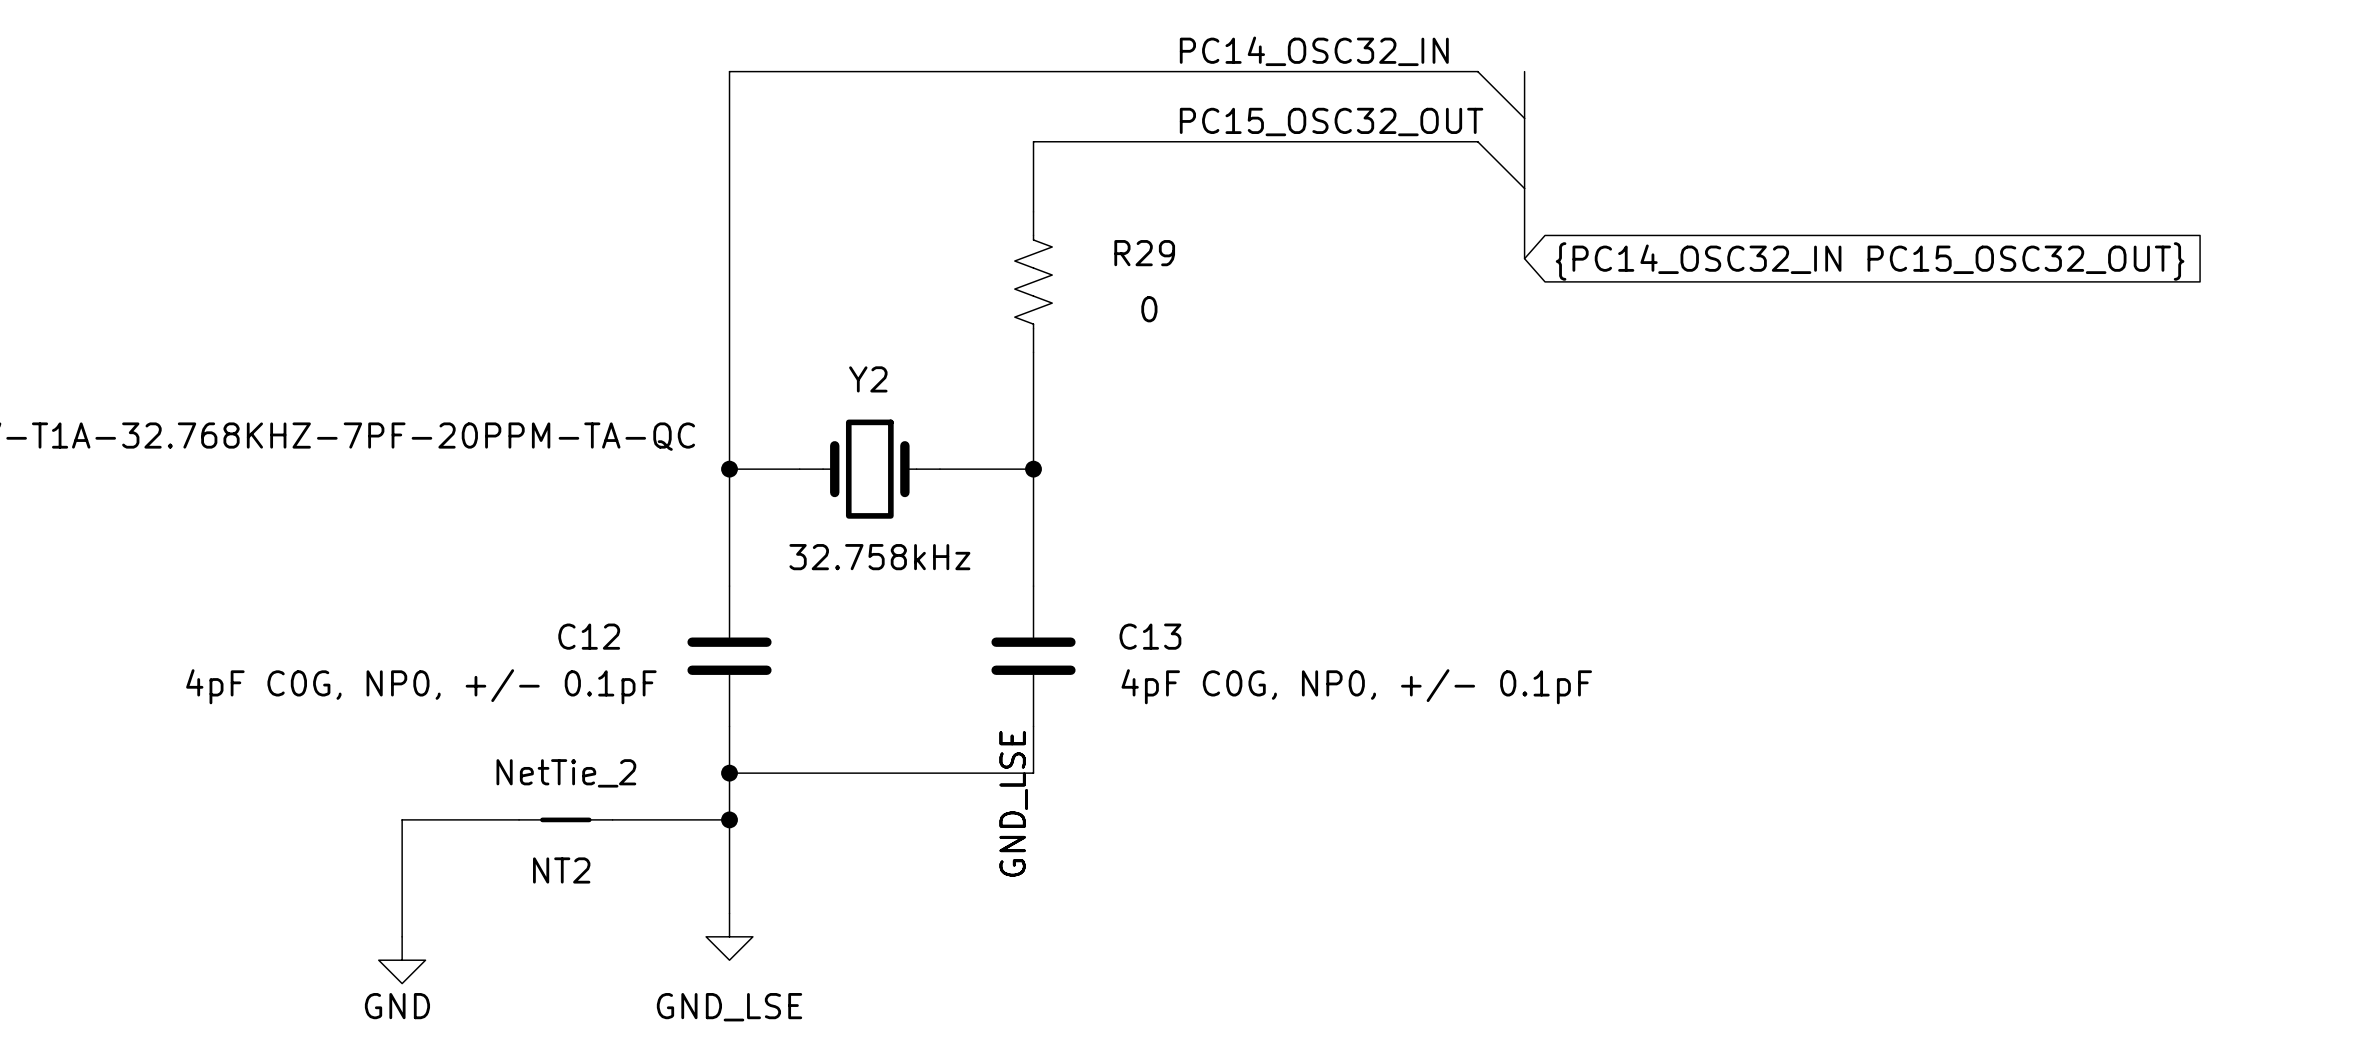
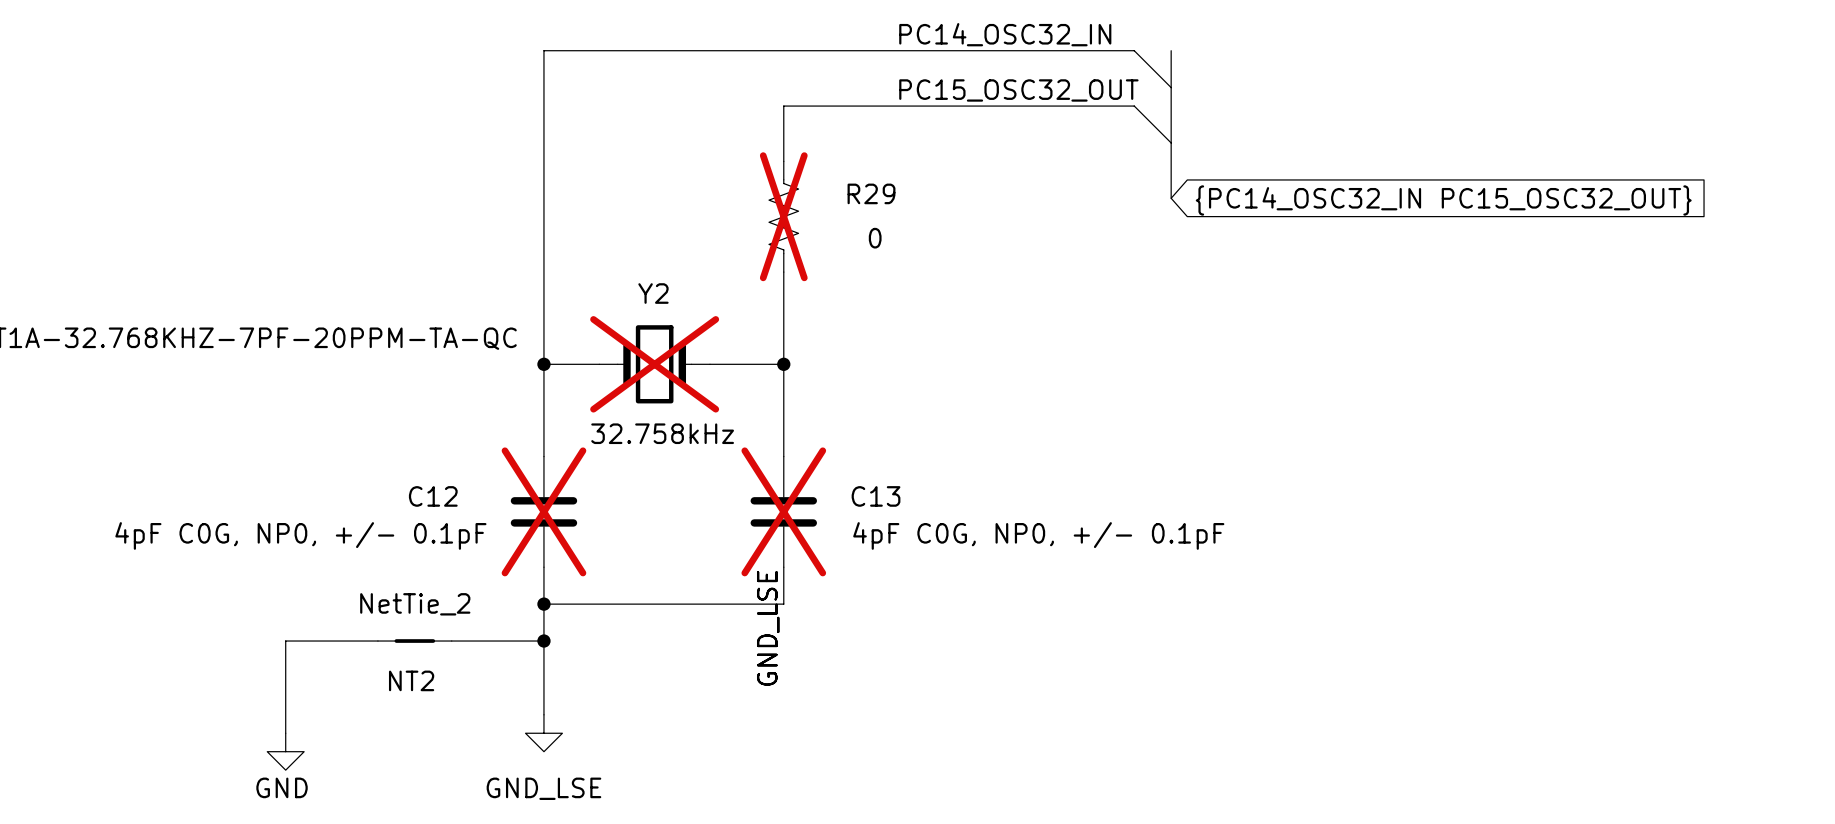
R29 do-not-place cross: none -> (783, 216)
Y2 do-not-place cross: none -> (654, 364)
C12 do-not-place cross: none -> (543, 511)
C13 do-not-place cross: none -> (783, 511)

